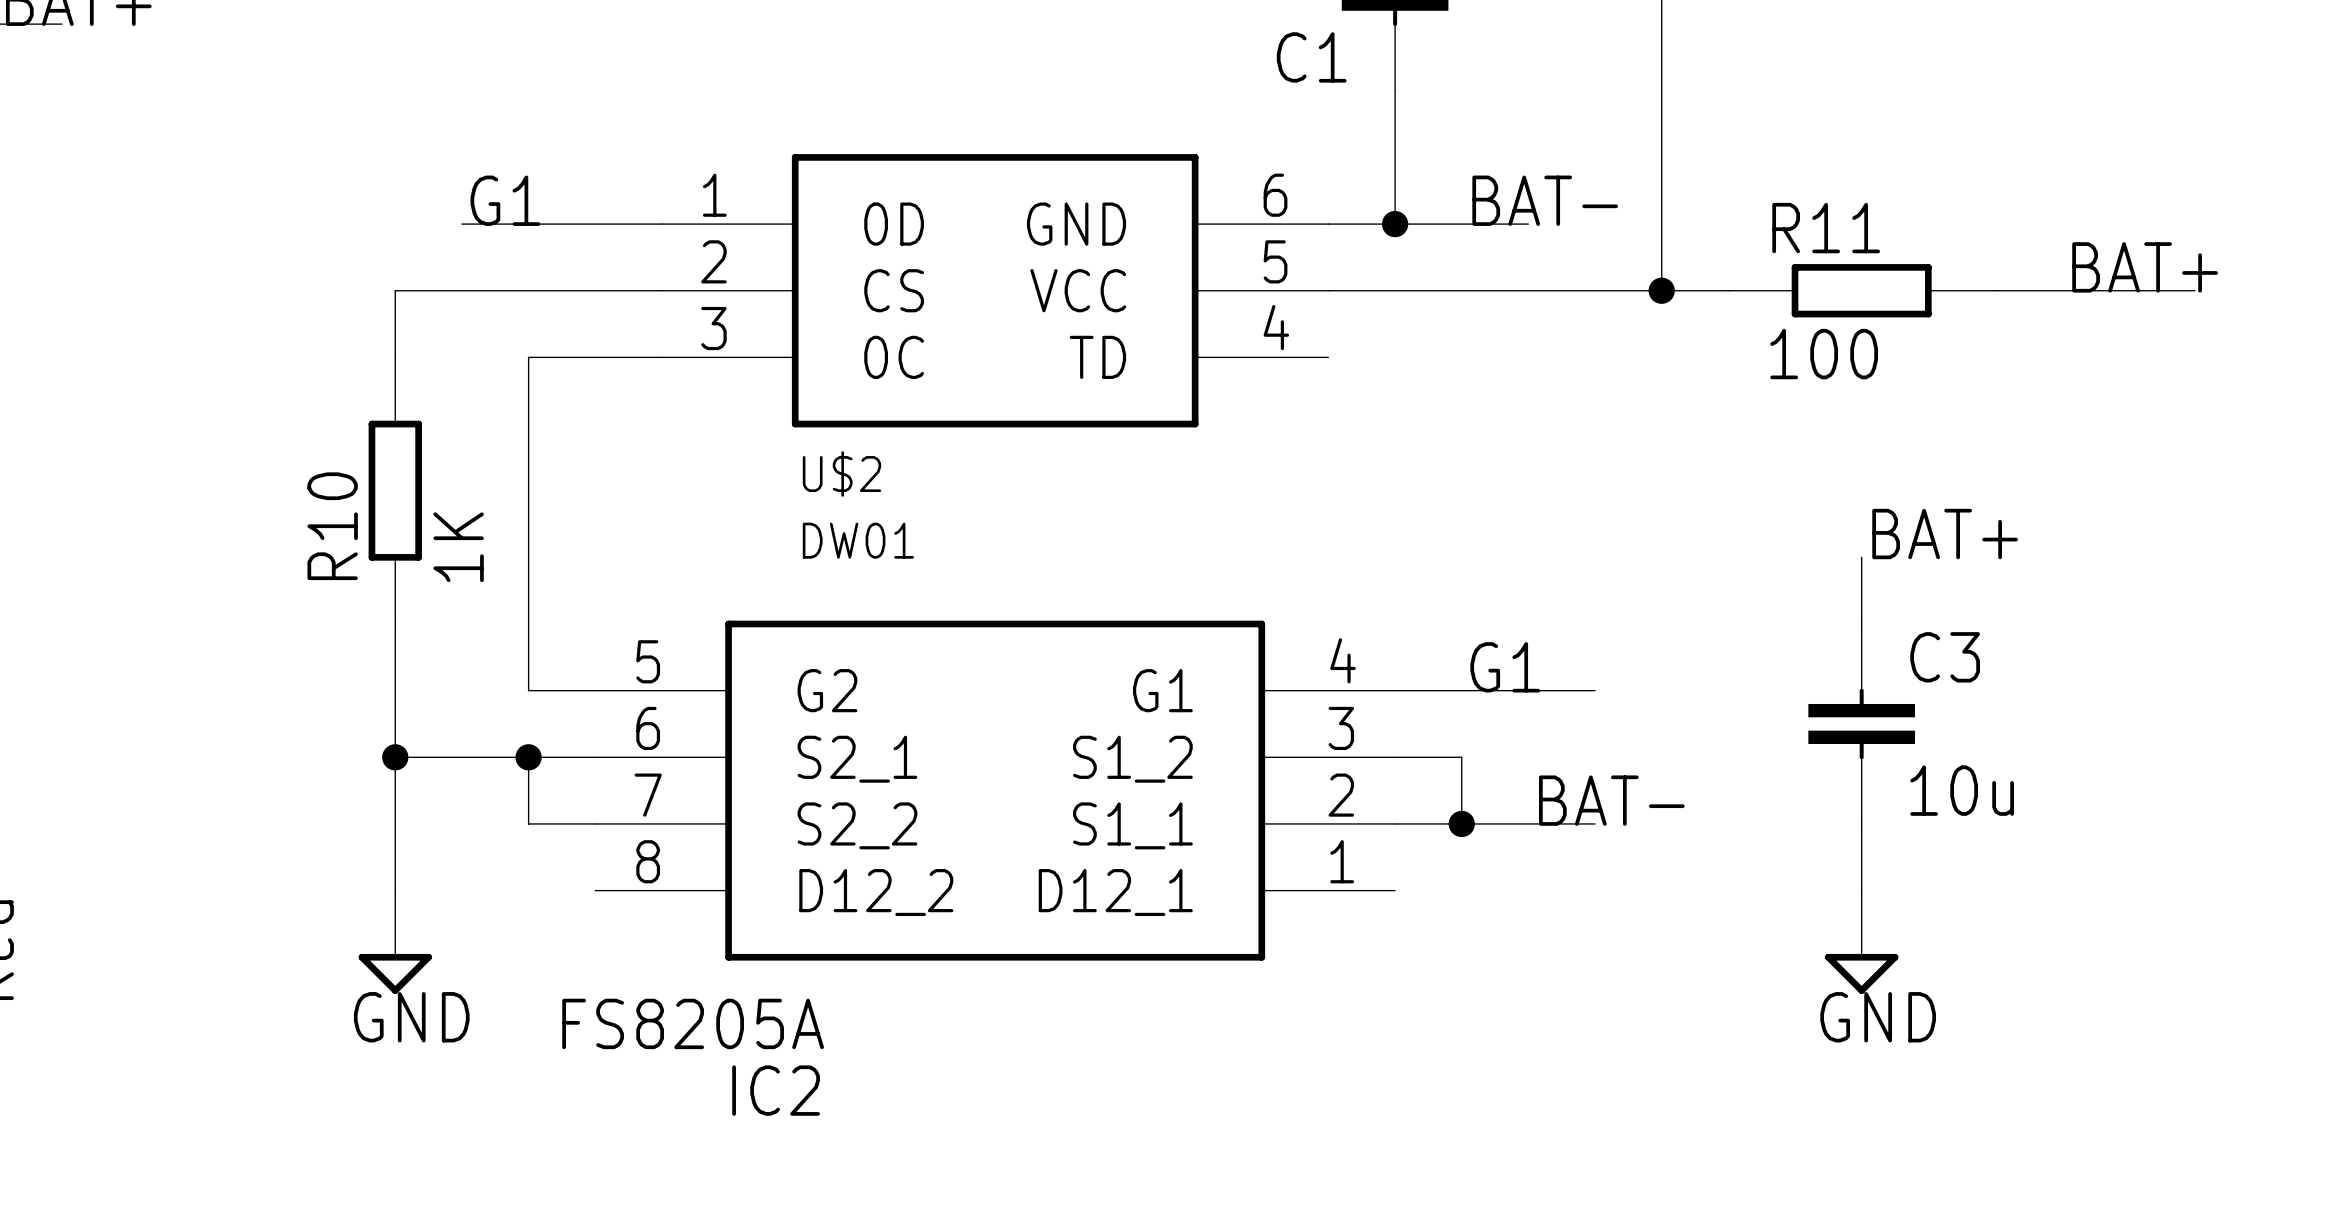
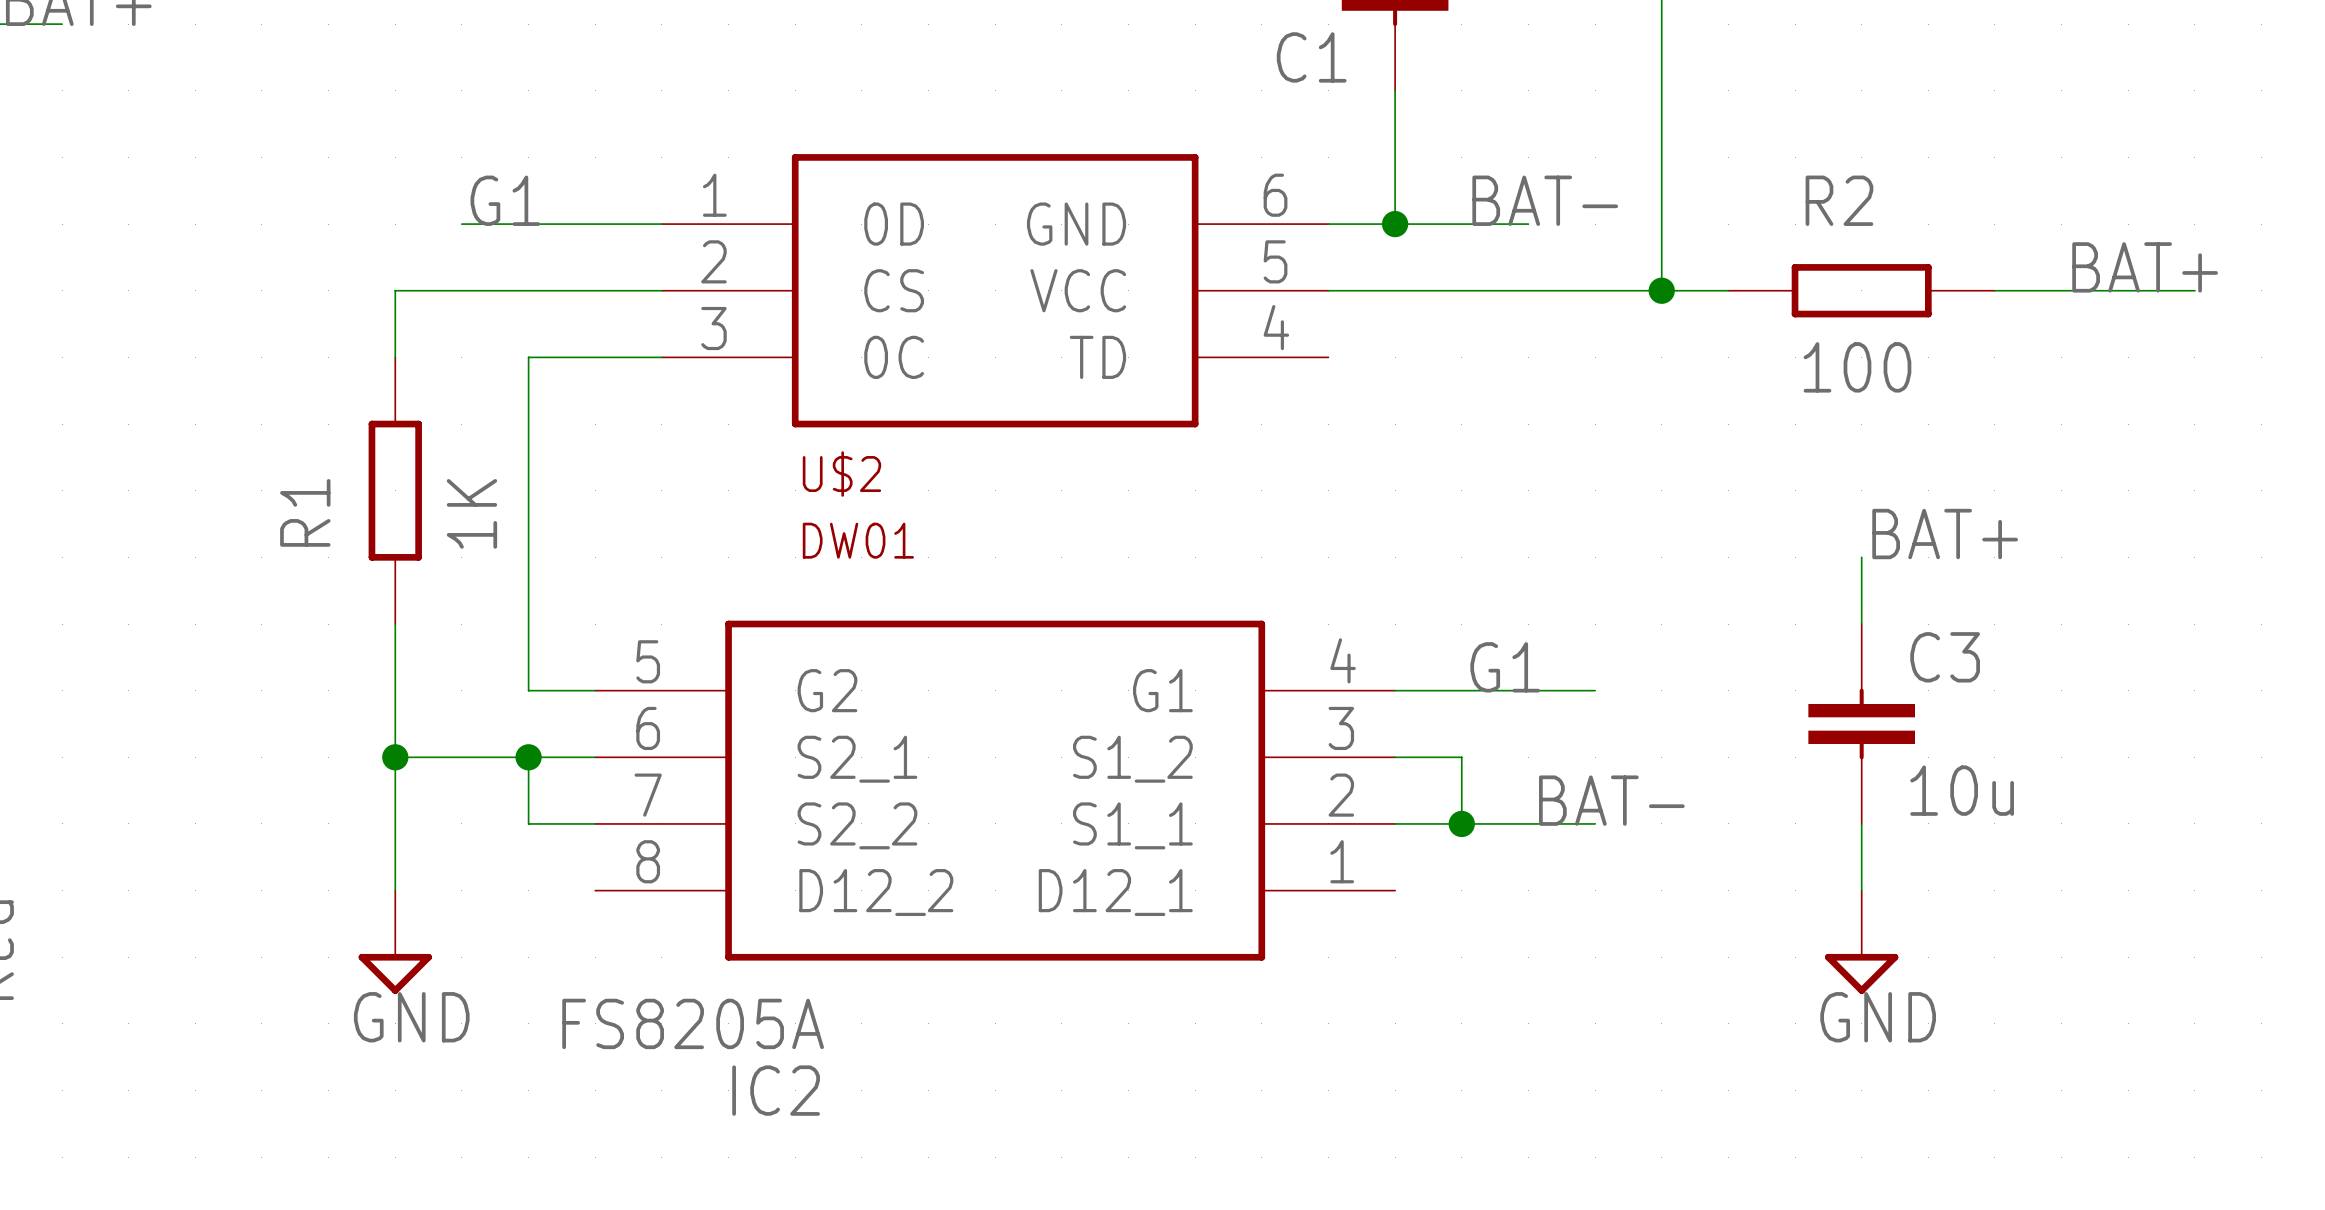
R11 name: R11 (1826, 228) -> R2 (1839, 200)
R11 value position: 100 (1824, 354) -> 100 (1857, 367)
R10 name: R10 (332, 526) -> R1 (305, 512)
R10 value position: 1K (458, 547) -> 1K (471, 513)

